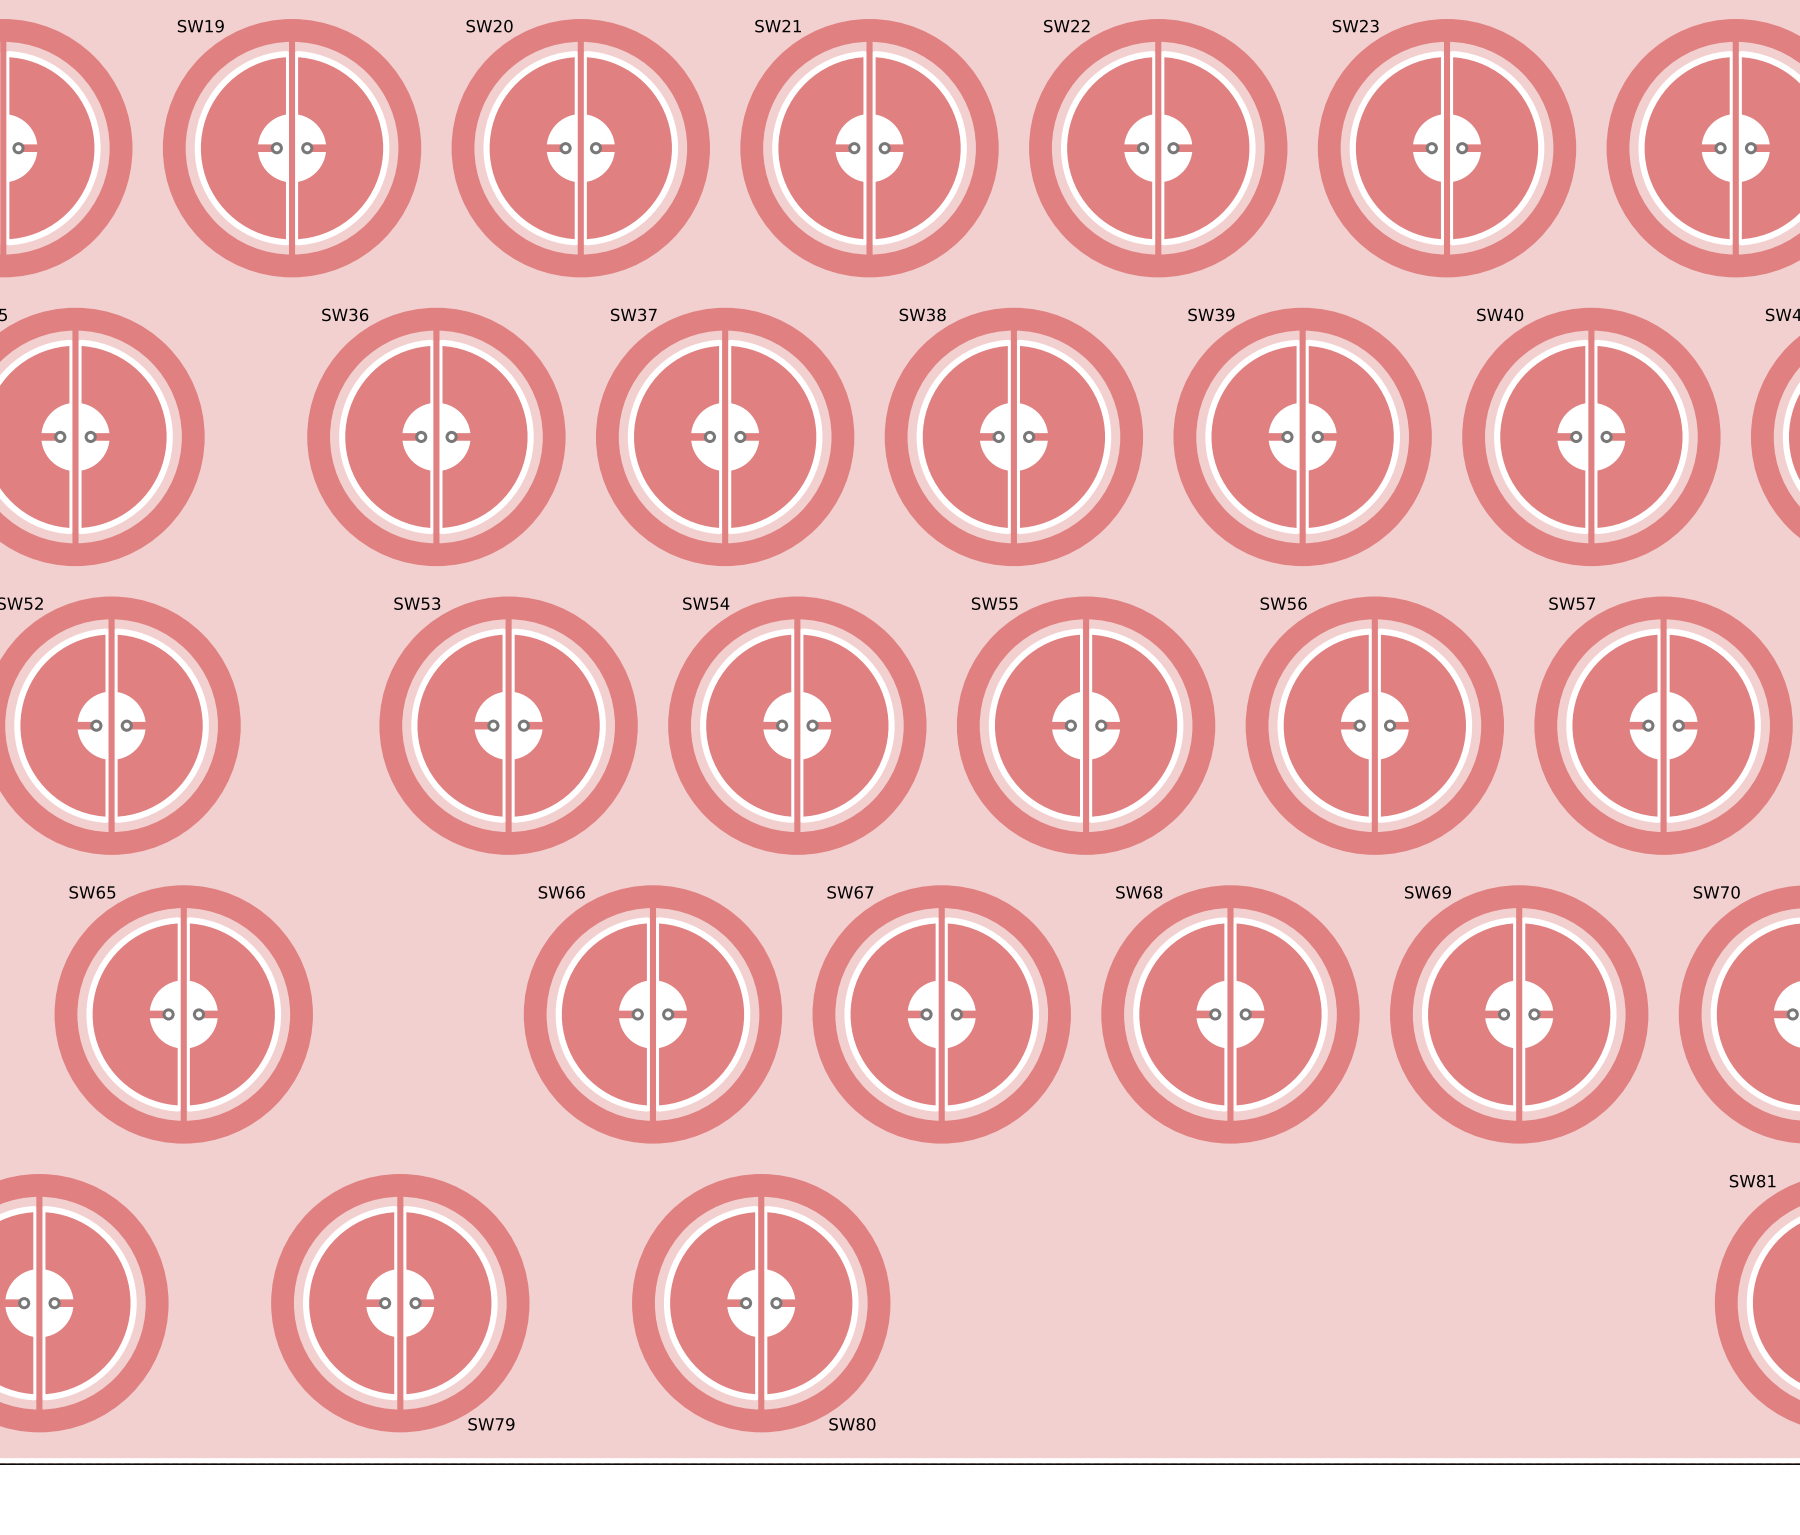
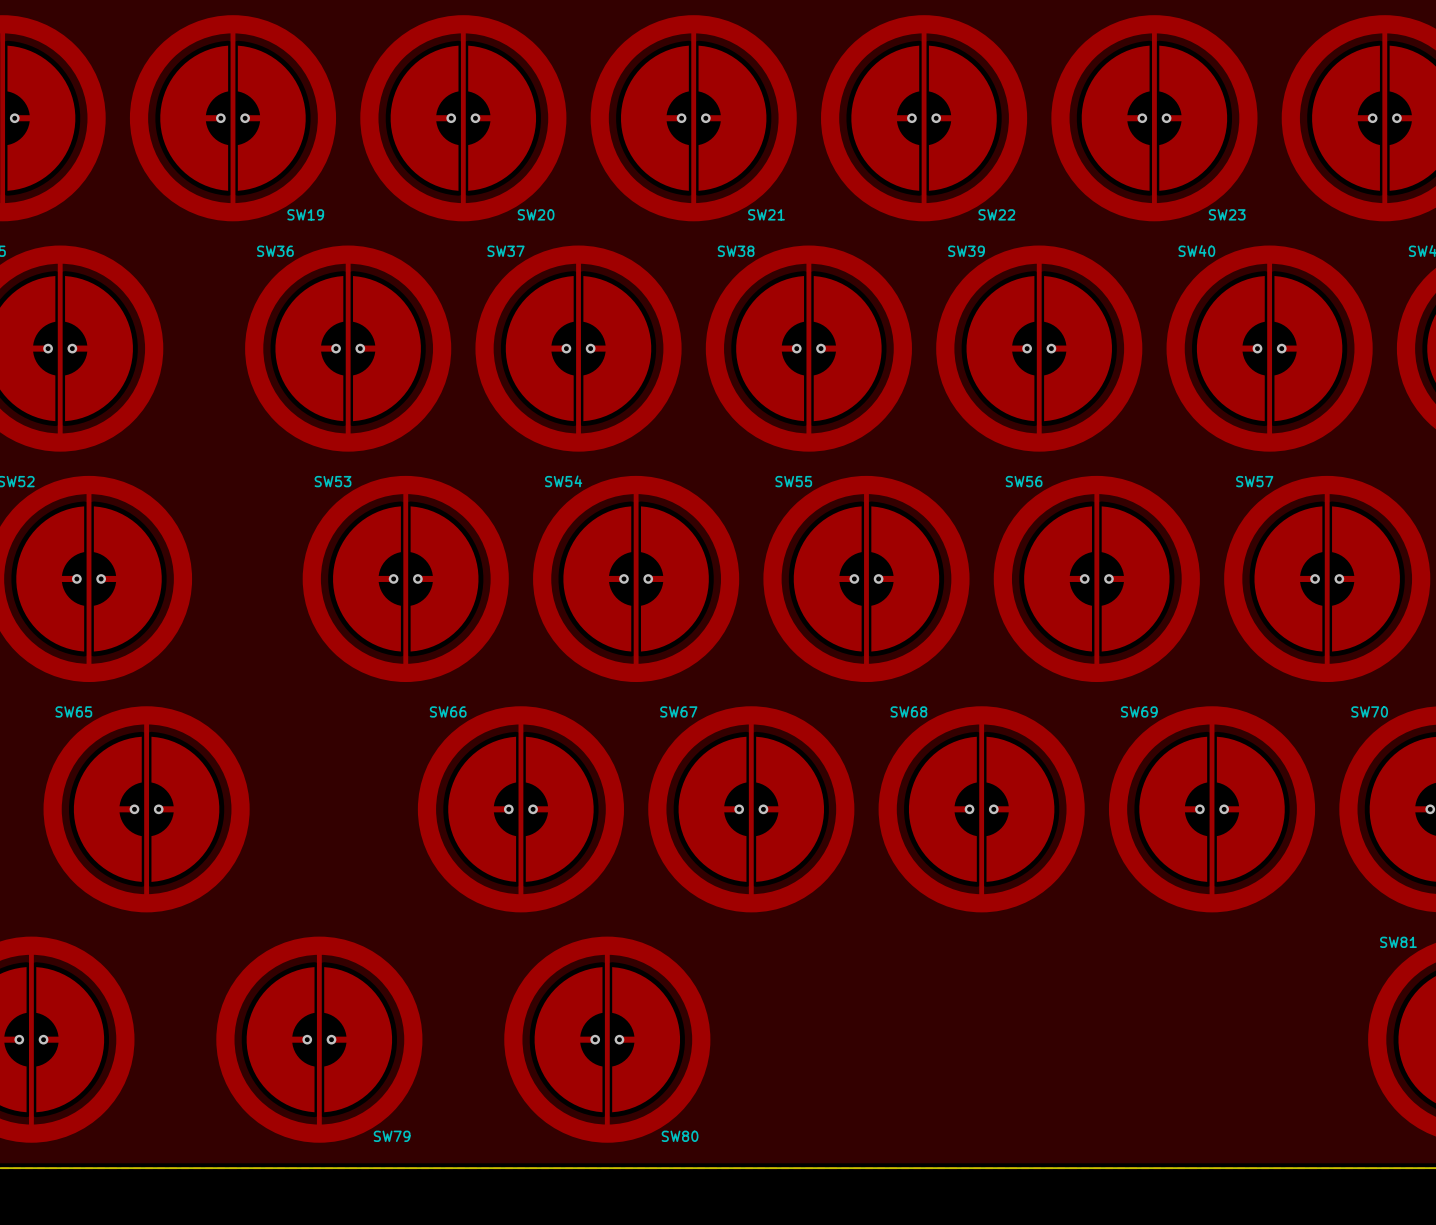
SW19 rotation: 0° (292, 148) -> 180° (232, 118)
SW20 rotation: 0° (580, 148) -> 180° (463, 118)
SW21 rotation: 0° (869, 148) -> 180° (693, 118)
SW22 rotation: 0° (1158, 148) -> 180° (924, 118)
SW23 rotation: 0° (1447, 148) -> 180° (1154, 118)

